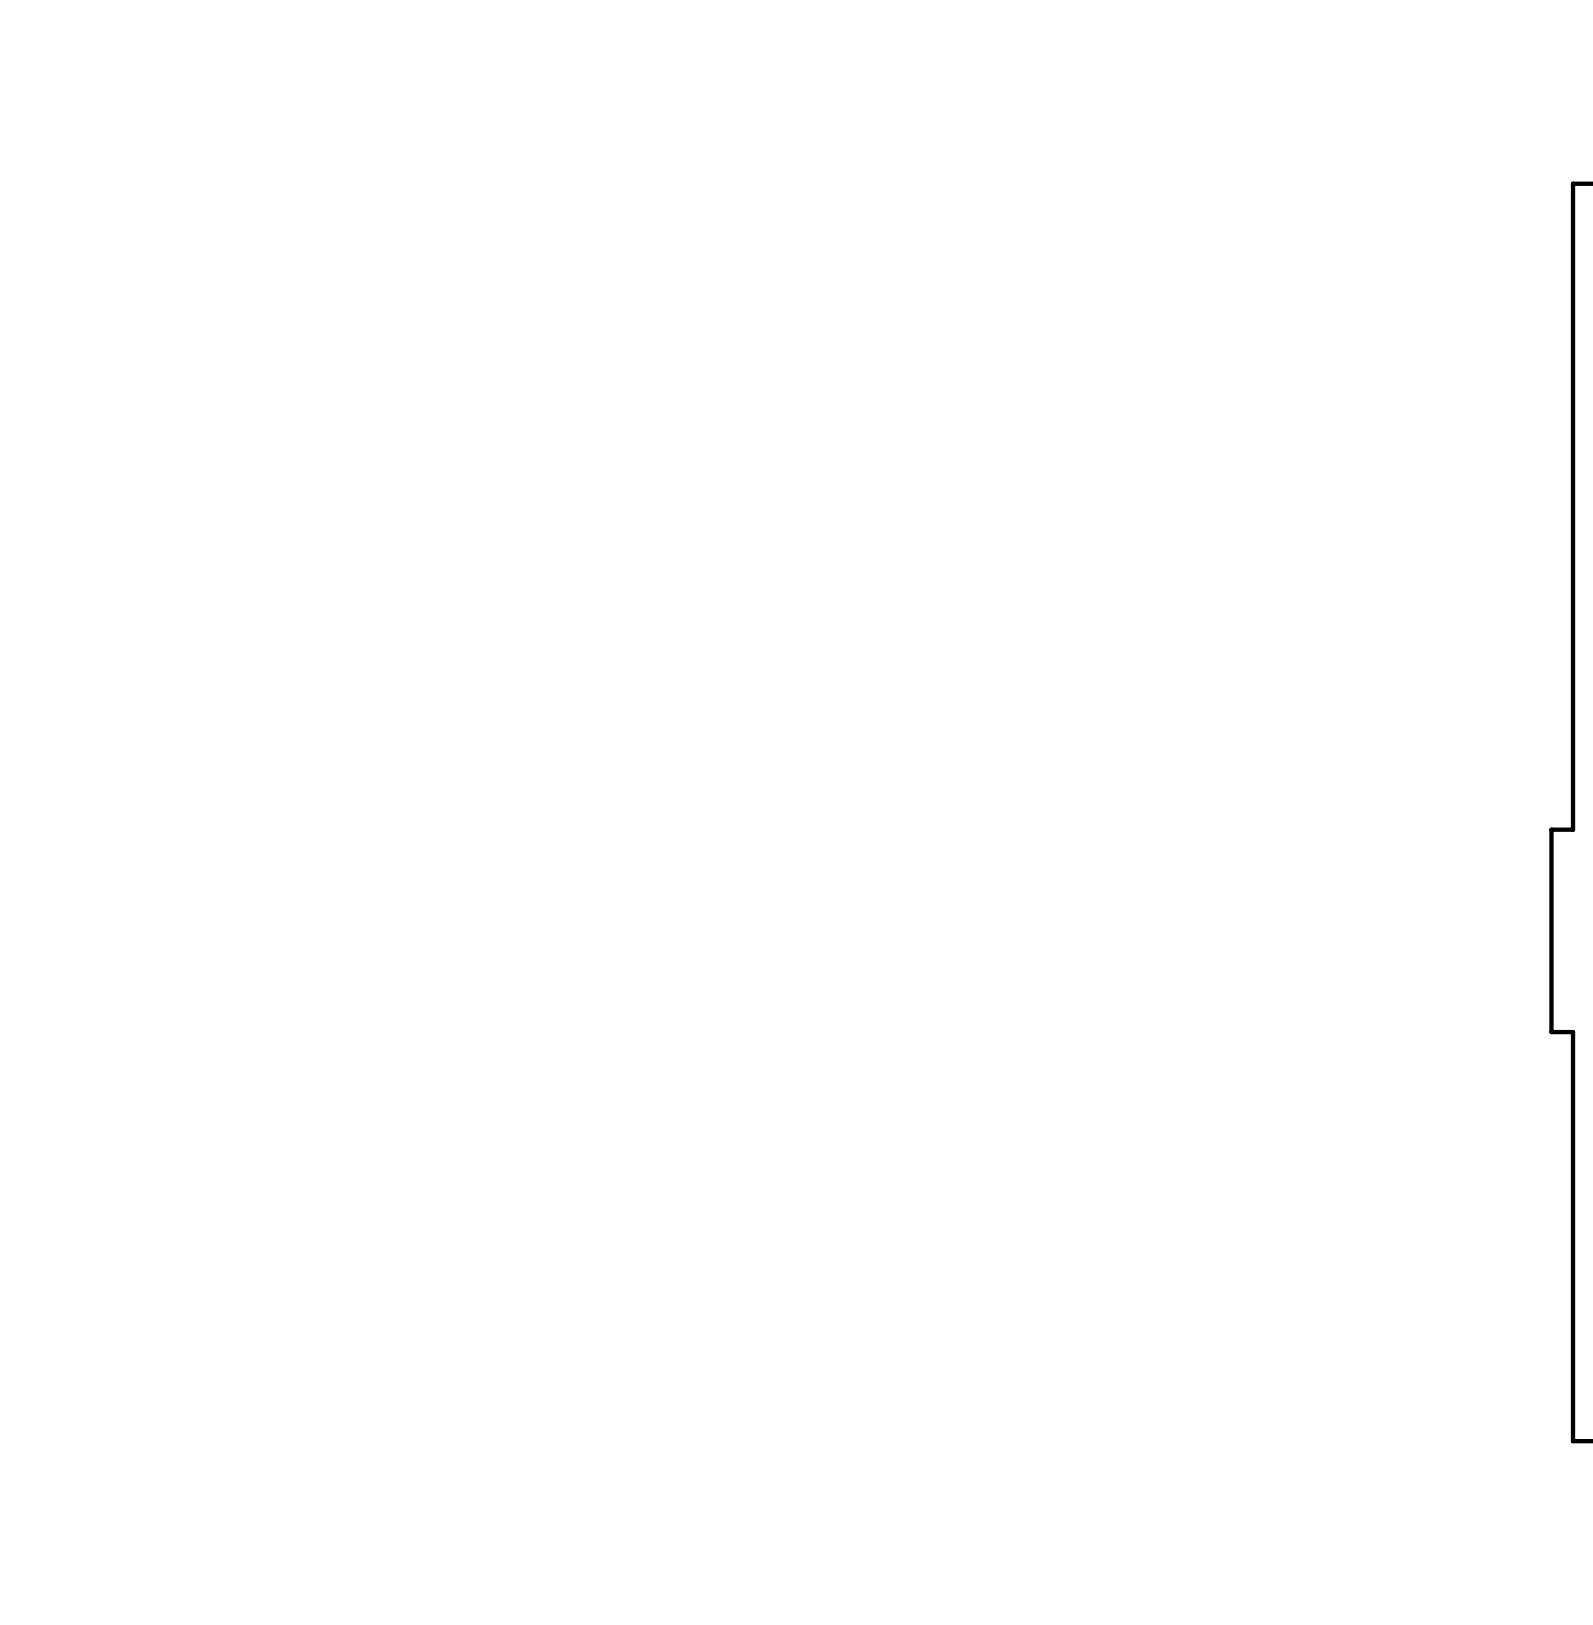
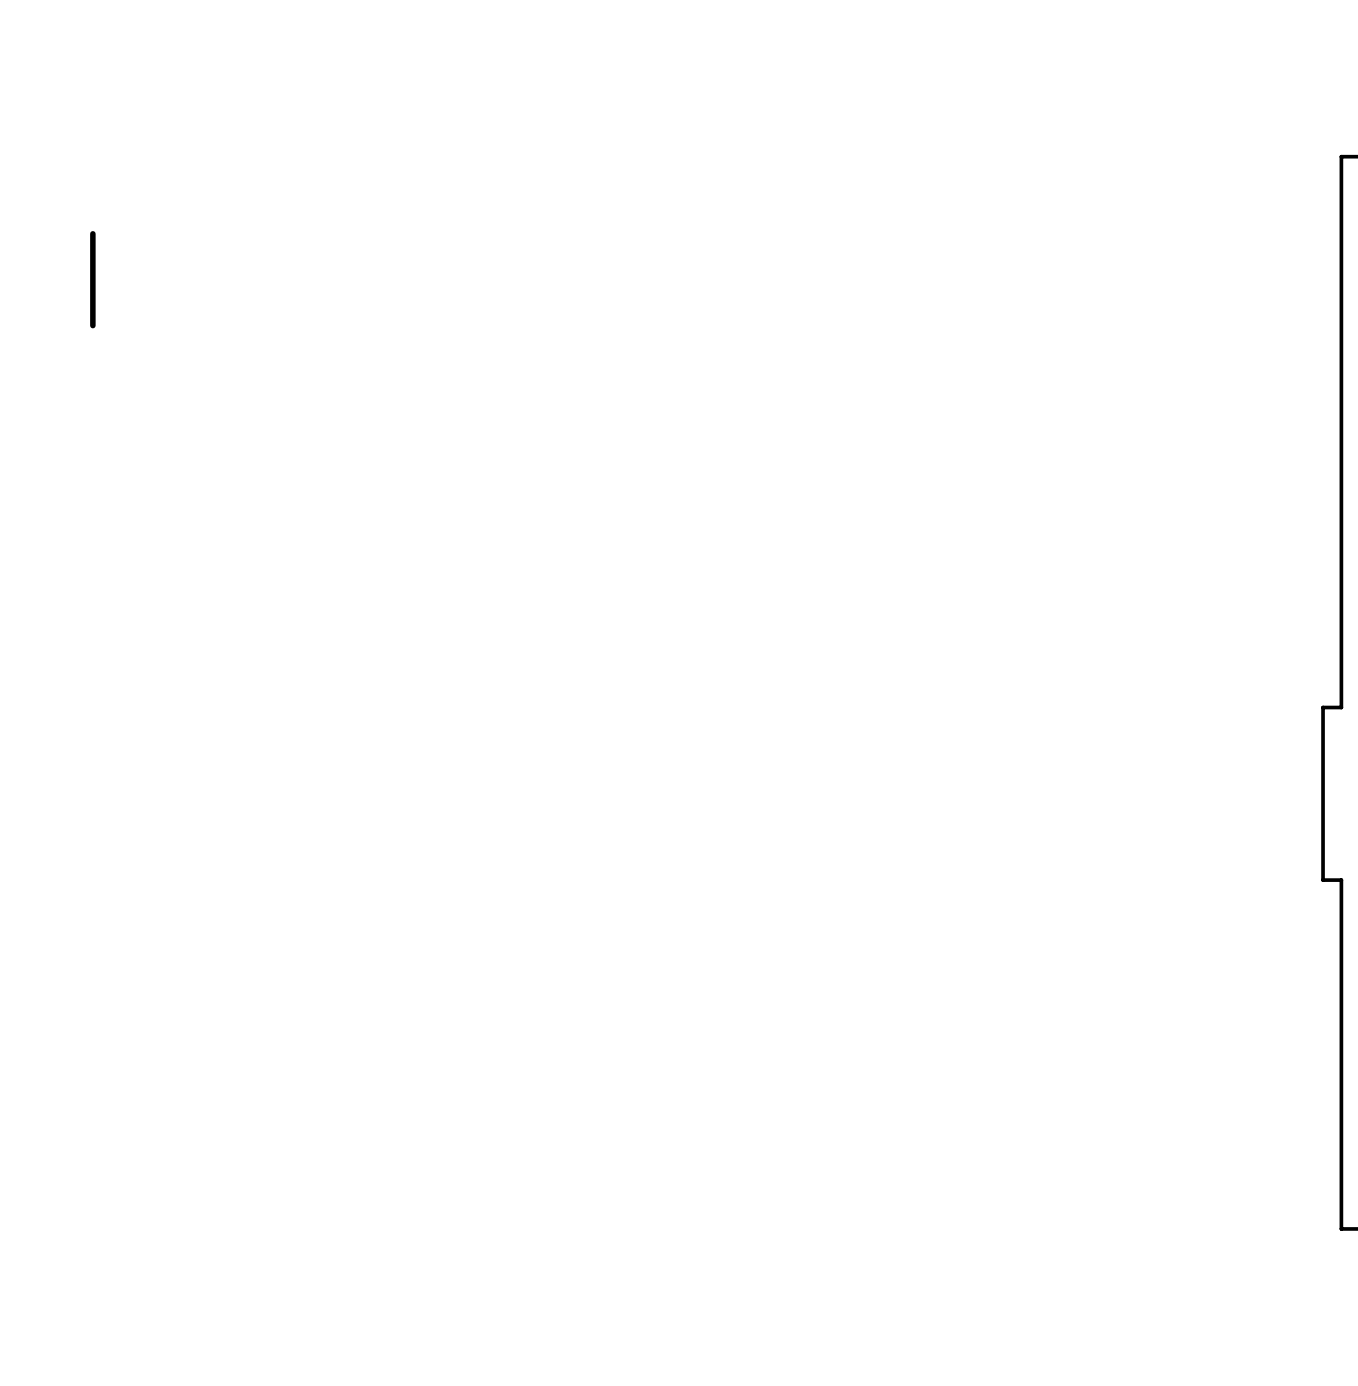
line: none -> (92, 233) (92, 325)

